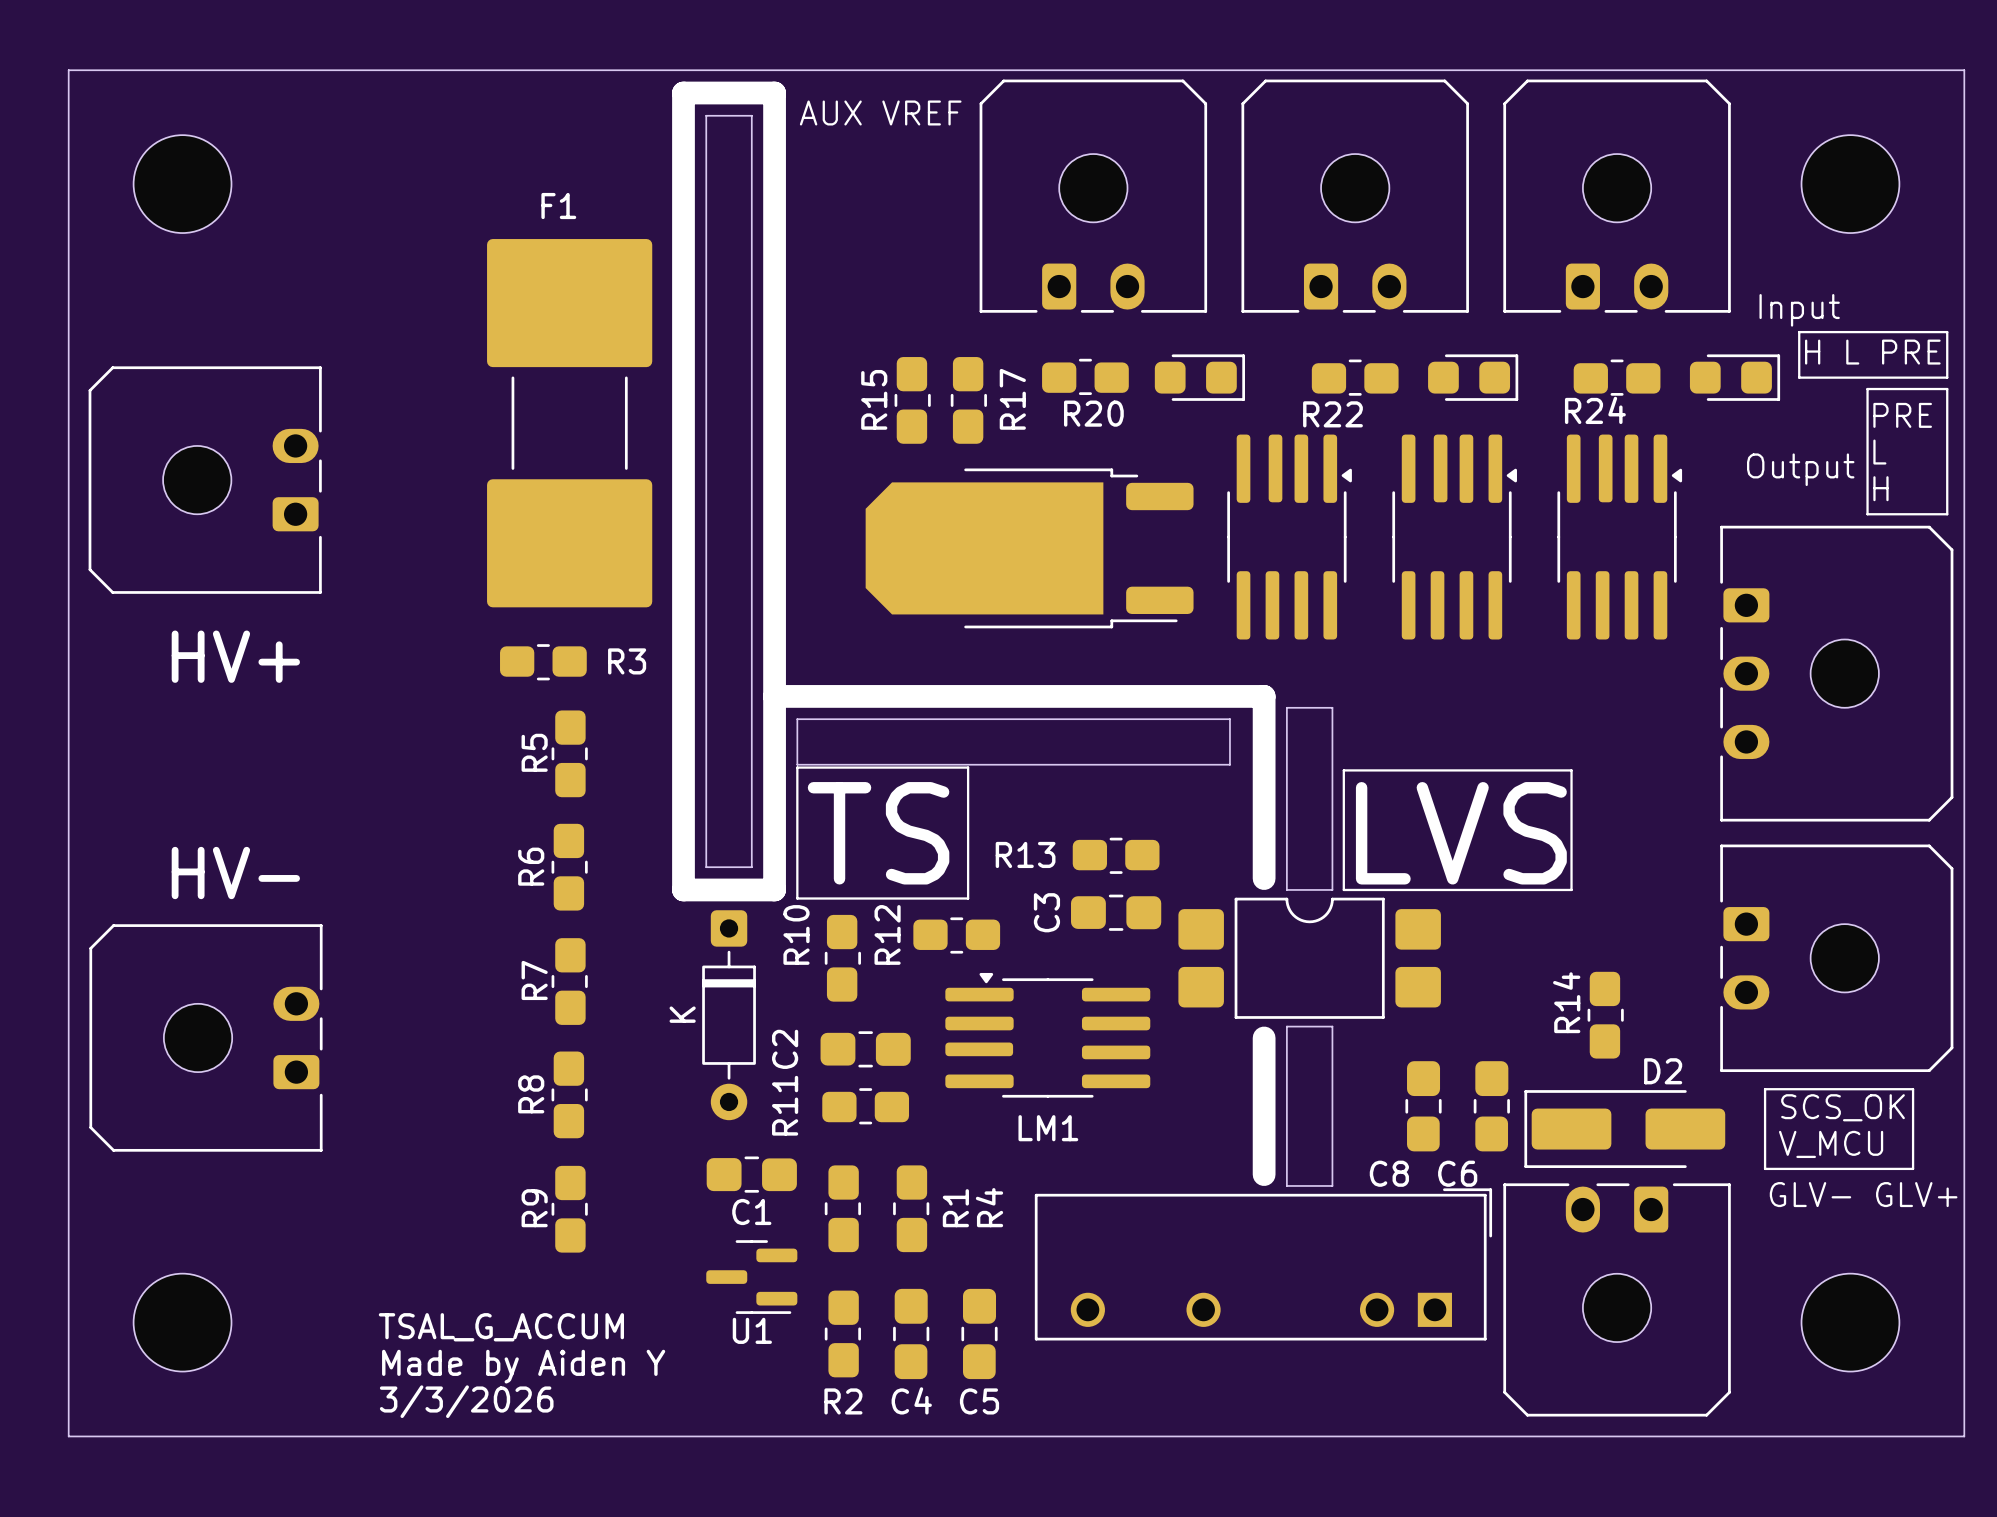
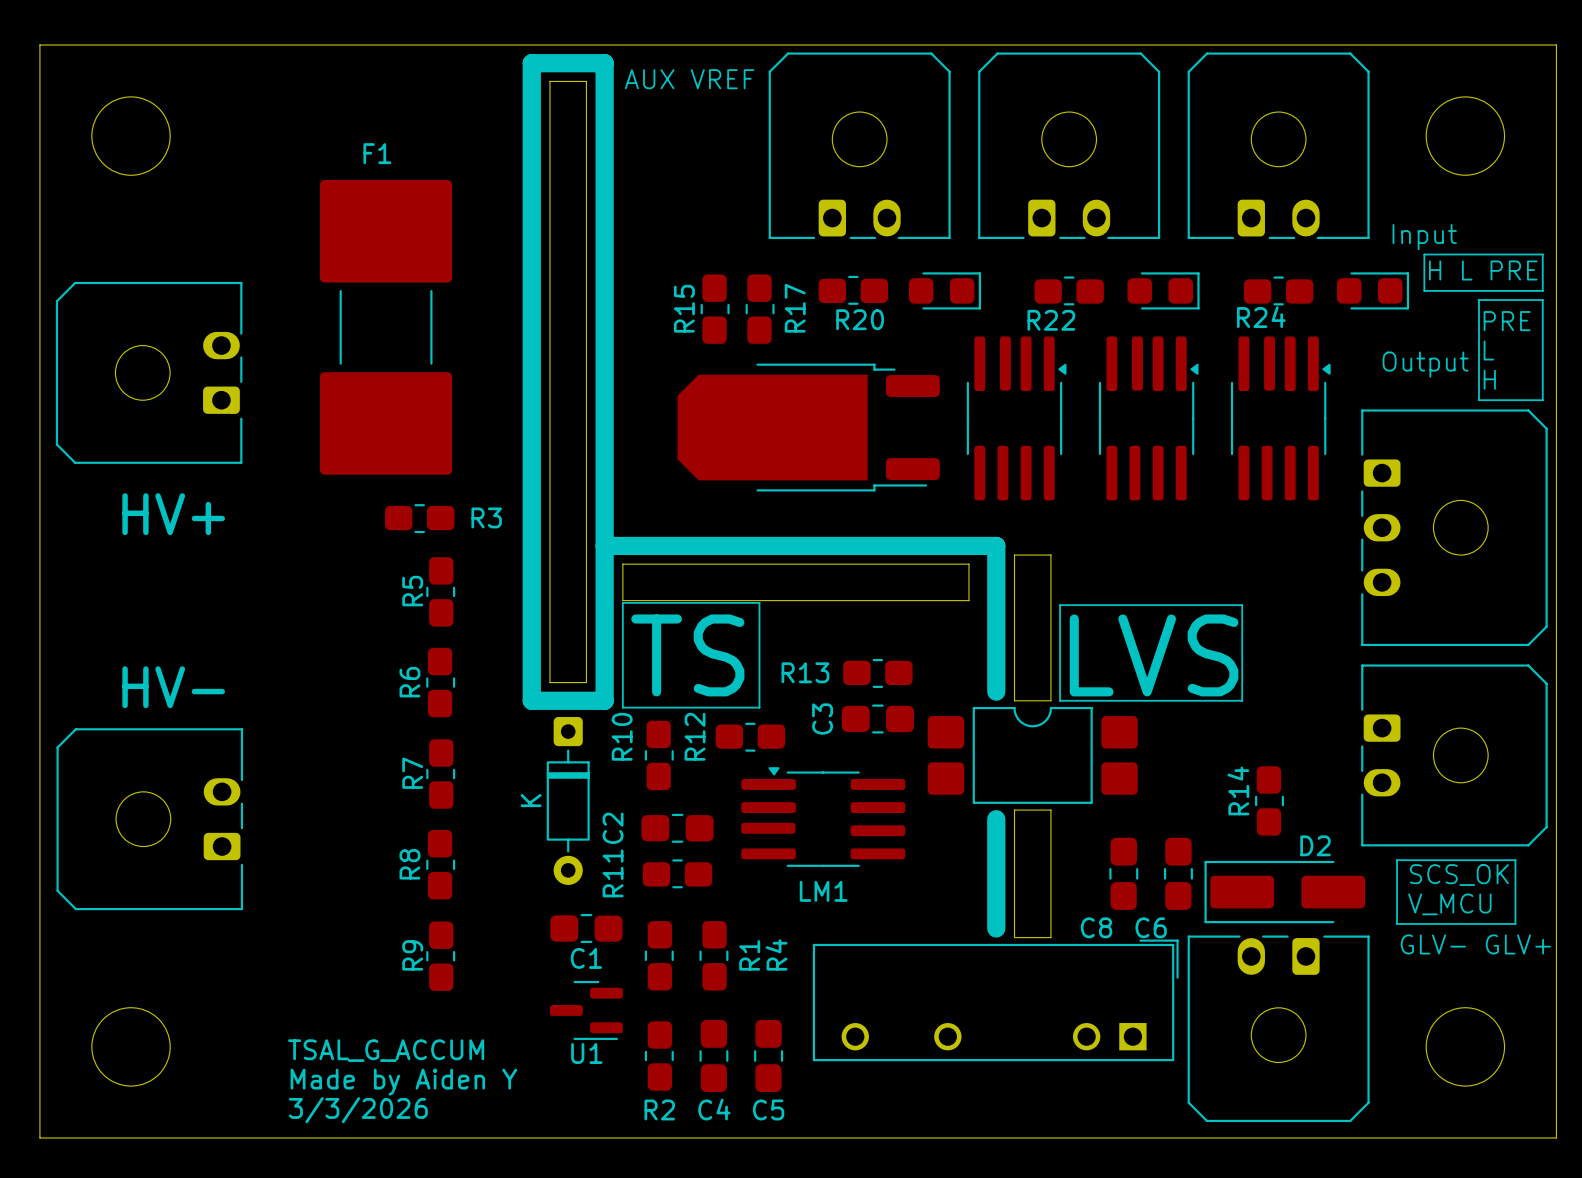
F1 position: (569, 423) -> (386, 327)

